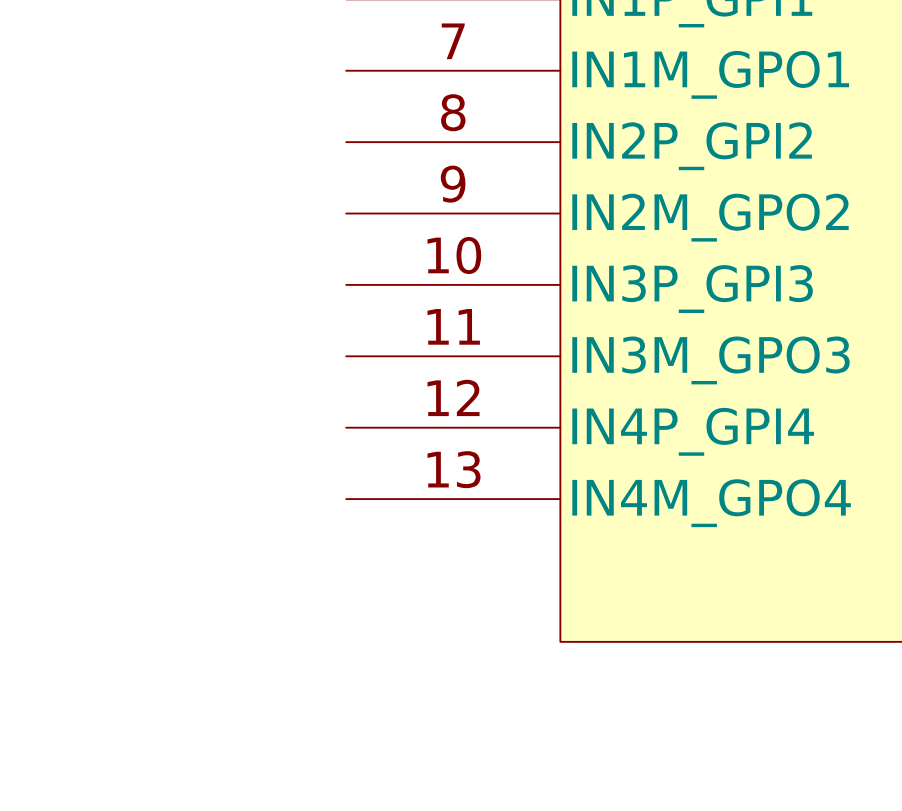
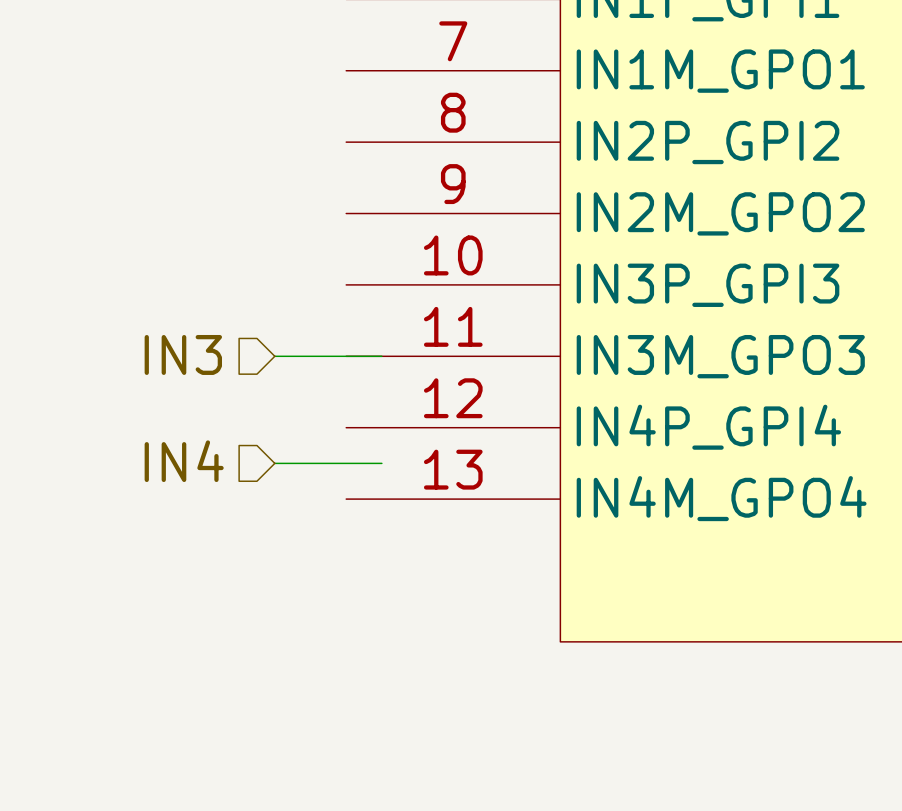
hierarchical label: none -> IN3 (183, 354)
wire: none -> (274, 356) (381, 356)
hierarchical label: none -> IN4 (184, 461)
wire: none -> (274, 463) (381, 463)

